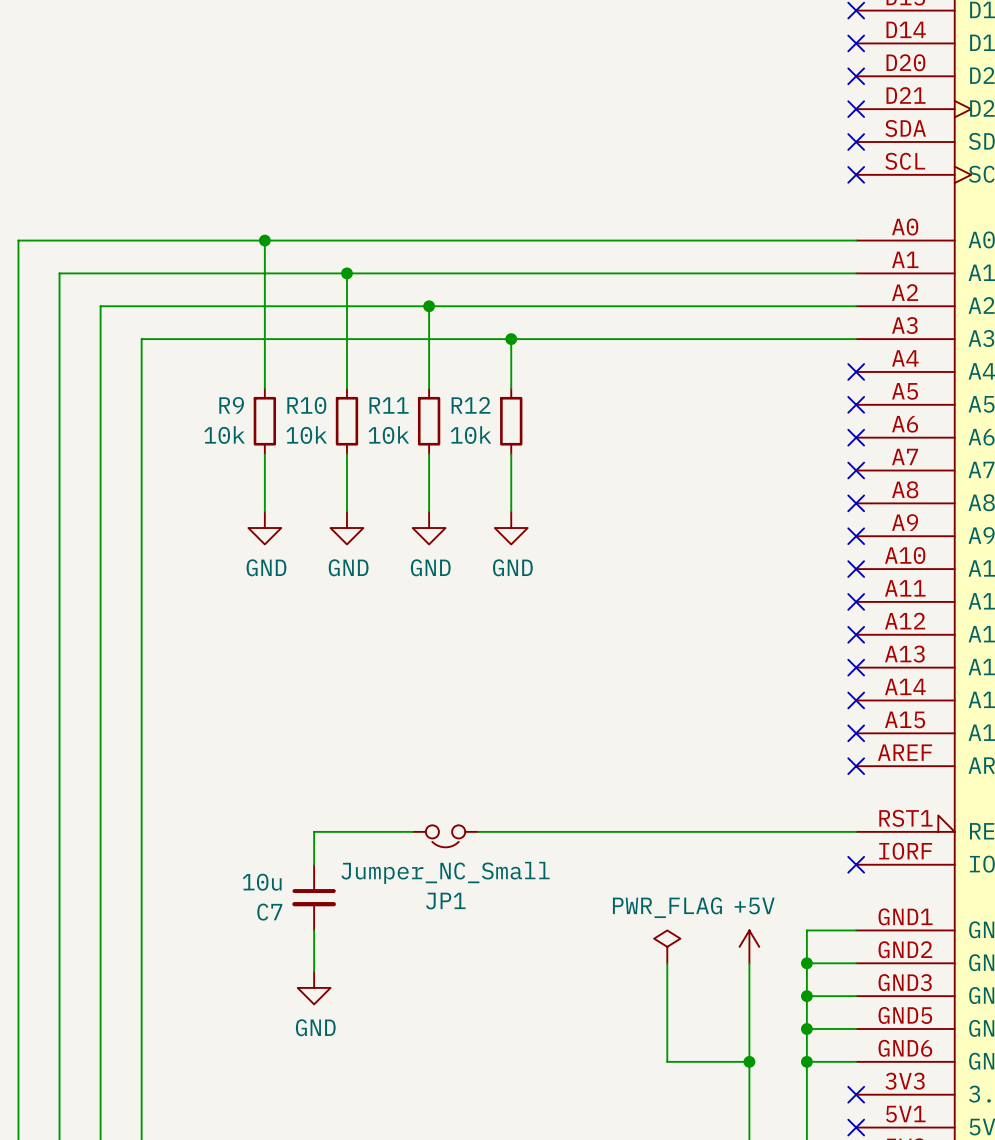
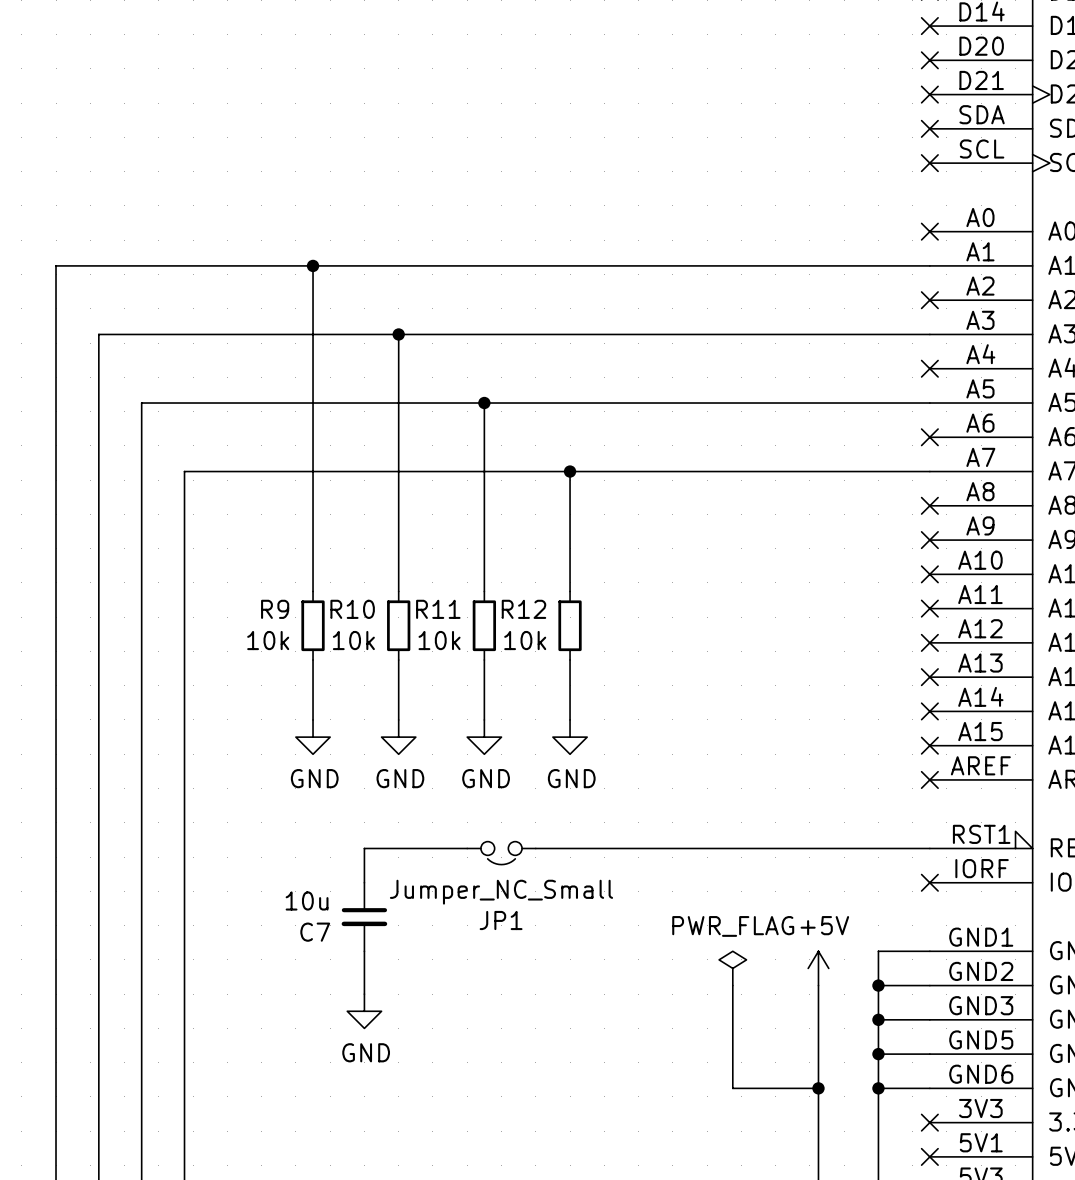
wire: (264, 240) (264, 273) -> none
junction position: (264, 240) -> (313, 265)
wire: (856, 240) (18, 240) (18, 273) -> none
no-connect mark: none -> (929, 231)
wire: (59, 273) (59, 339) -> (98, 265) (56, 265)
wire: (346, 273) (346, 339) -> (398, 385) (398, 454)
junction: (346, 273) -> none
wire: (429, 306) (429, 388) -> none
junction: (429, 306) -> none
wire: (856, 306) (100, 306) (100, 404) -> (929, 403) (141, 403)
no-connect mark: none -> (929, 300)
wire: (141, 339) (141, 470) -> (184, 334) (98, 334)
junction: none -> (398, 334)
wire: (511, 339) (511, 388) -> (484, 403) (484, 454)
junction: (511, 339) -> none
wire: none -> (313, 385) (313, 454)
junction: none -> (484, 403)
no-connect mark: (856, 404) -> none
R9 position: (264, 421) -> (313, 625)
R10 position: (346, 421) -> (398, 625)
R11 position: (429, 421) -> (484, 625)
R12 position: (511, 421) -> (570, 625)
wire: (511, 454) (511, 470) -> none
wire: none -> (184, 471) (929, 471)
junction: none -> (570, 471)
no-connect mark: (856, 470) -> none
wire: none -> (313, 514) (313, 591)
wire: none -> (398, 514) (398, 591)
wire: none -> (484, 514) (484, 591)
wire: none -> (570, 514) (570, 591)
power symbol: GND (264, 528) -> none
power symbol: GND (346, 528) -> none
power symbol: GND (429, 528) -> none
power symbol: GND (511, 528) -> none
wire: none -> (313, 660) (313, 719)
wire: none -> (398, 660) (398, 719)
wire: none -> (484, 660) (484, 719)
wire: none -> (570, 660) (570, 719)
power symbol: none -> GND (313, 737)
power symbol: none -> GND (398, 737)
power symbol: none -> GND (484, 737)
power symbol: none -> GND (570, 737)

